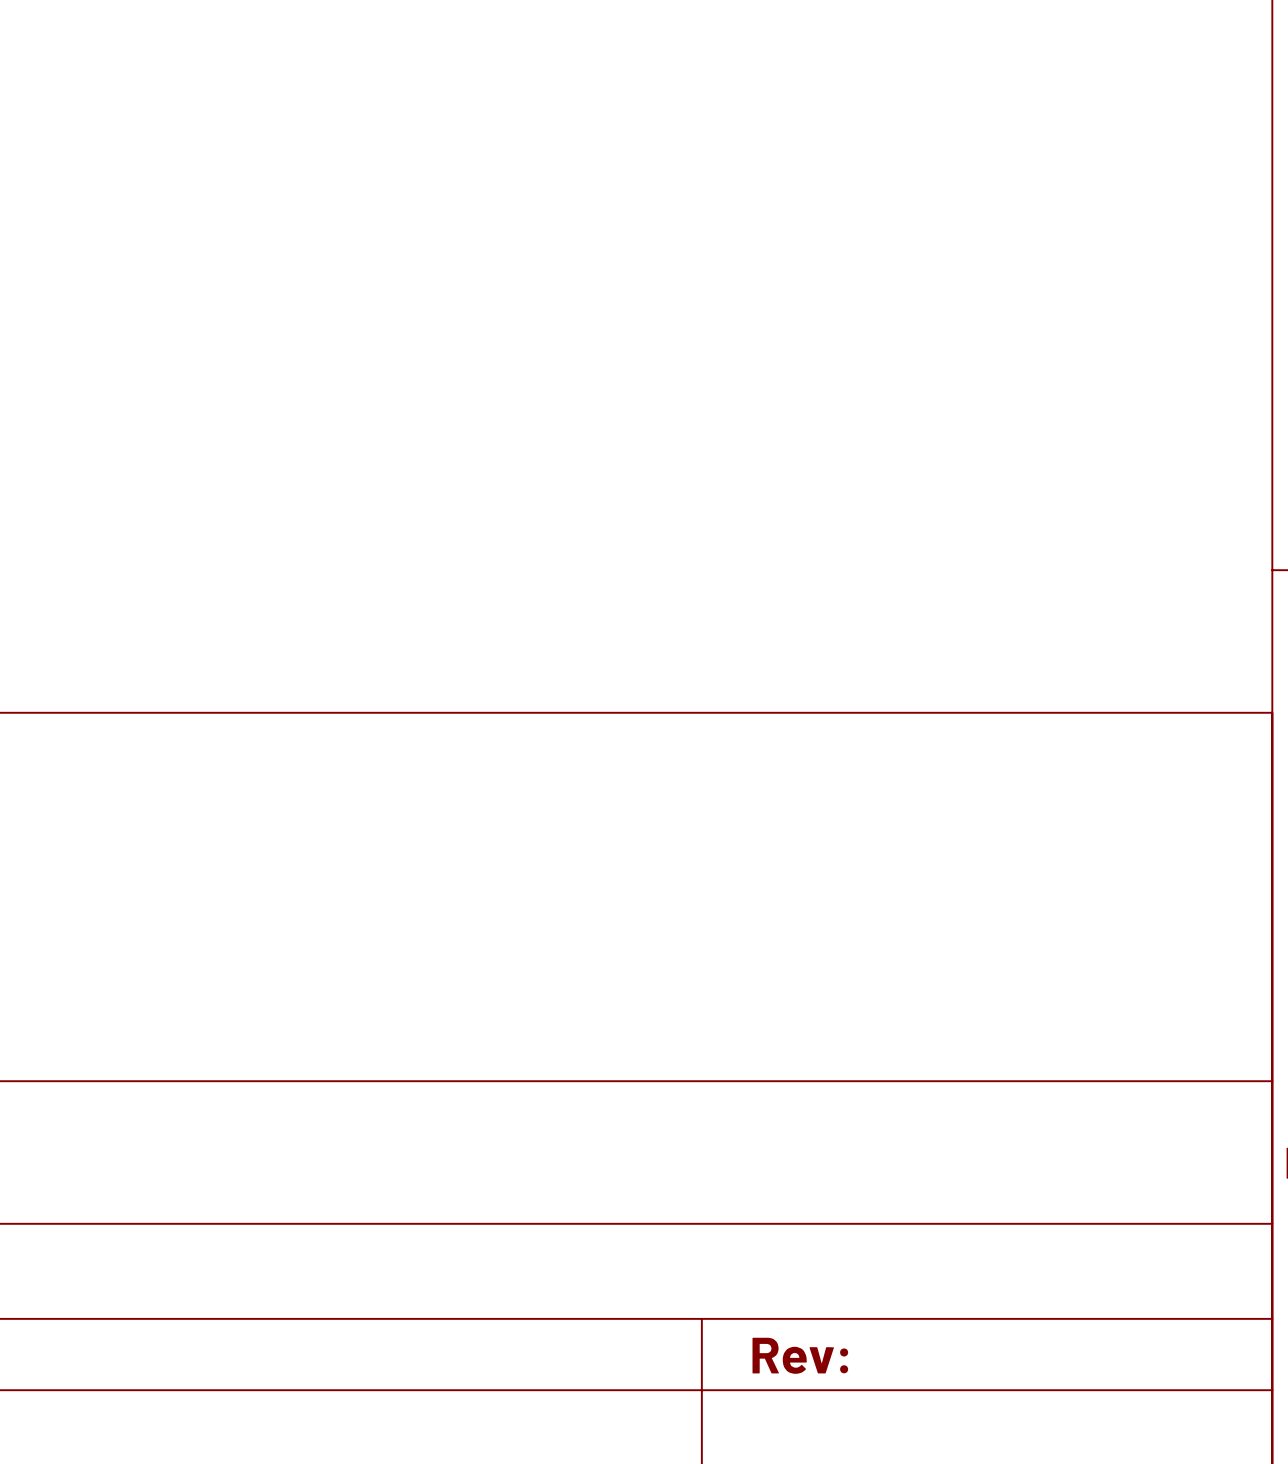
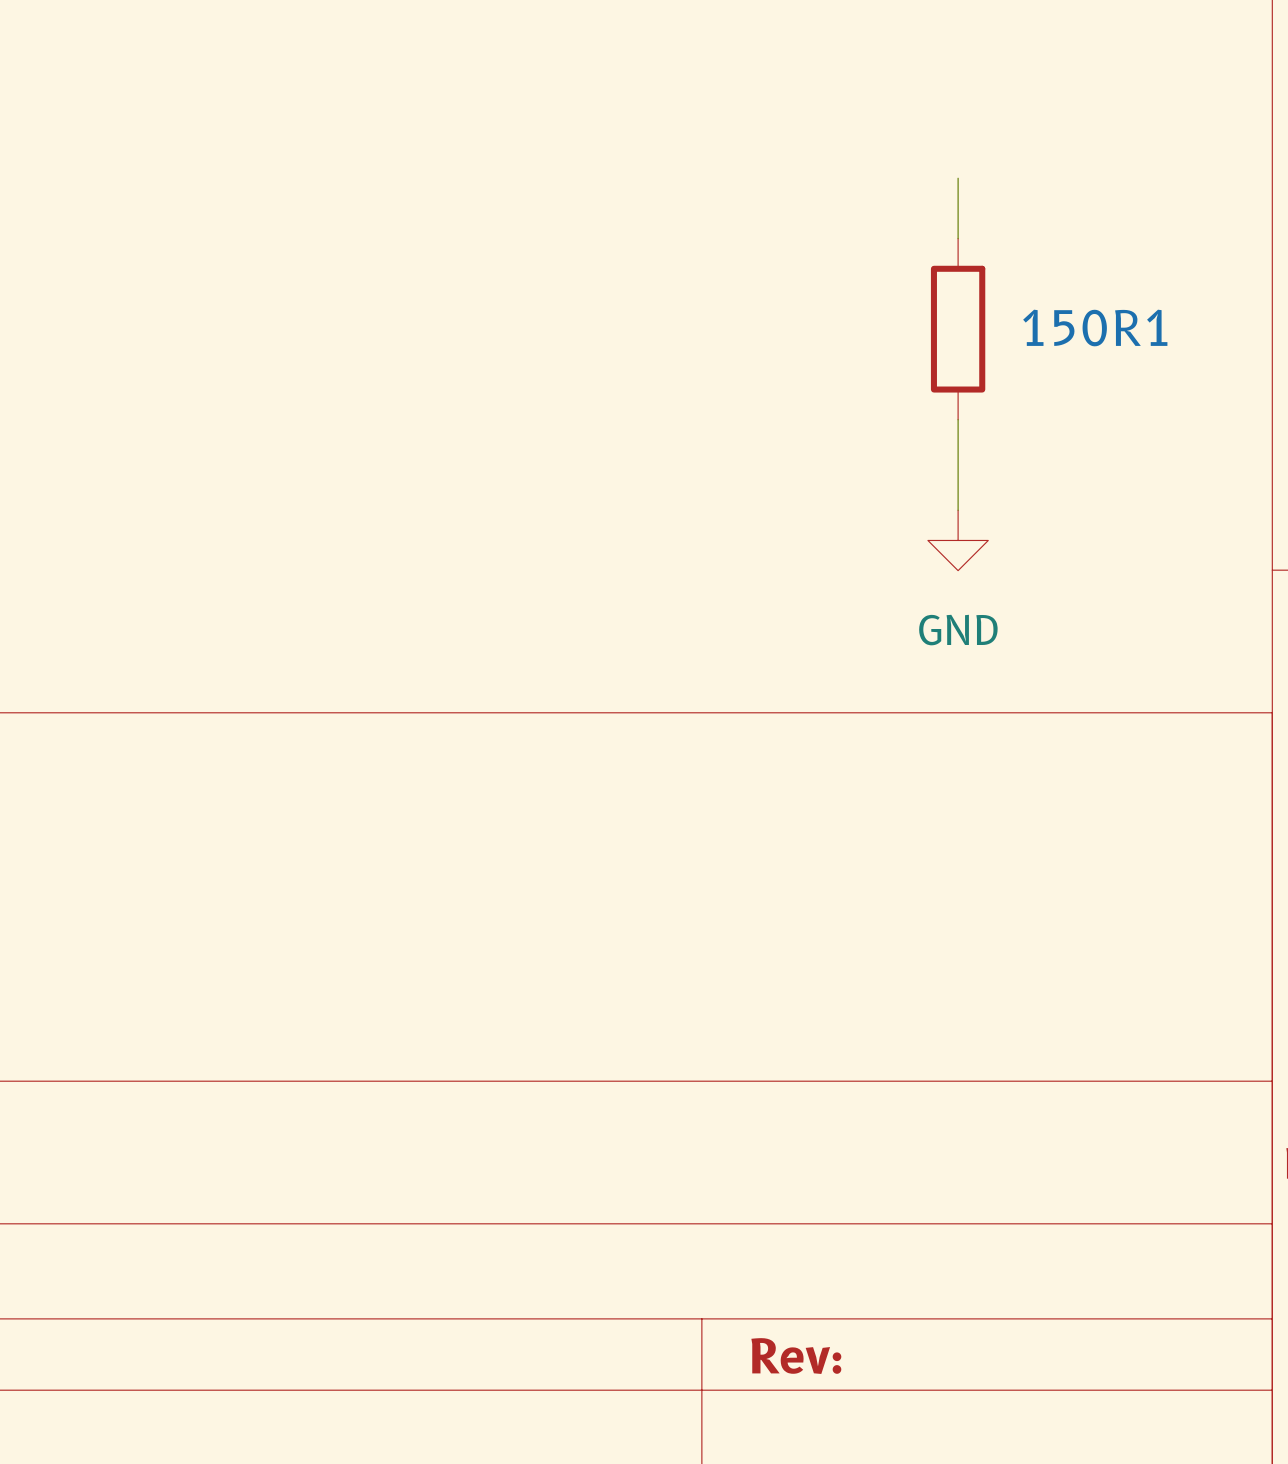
wire: none -> (958, 178) (958, 238)
150R1: none -> (958, 329)
wire: none -> (958, 419) (958, 510)
power symbol: none -> GND (958, 540)

